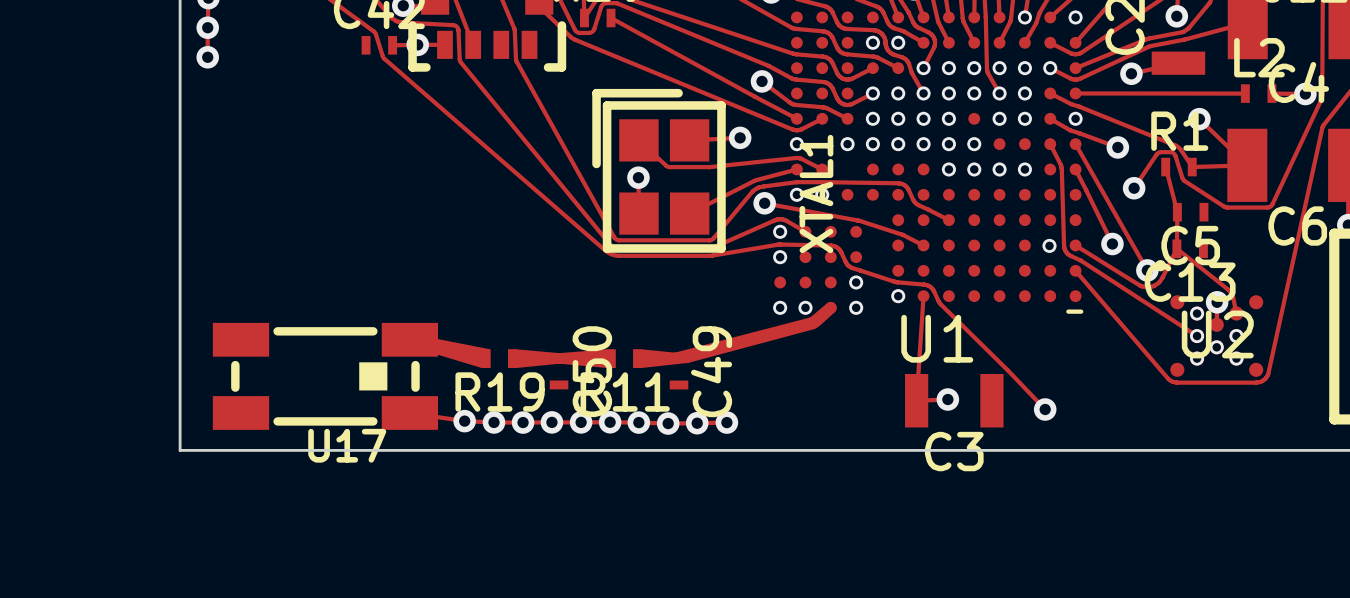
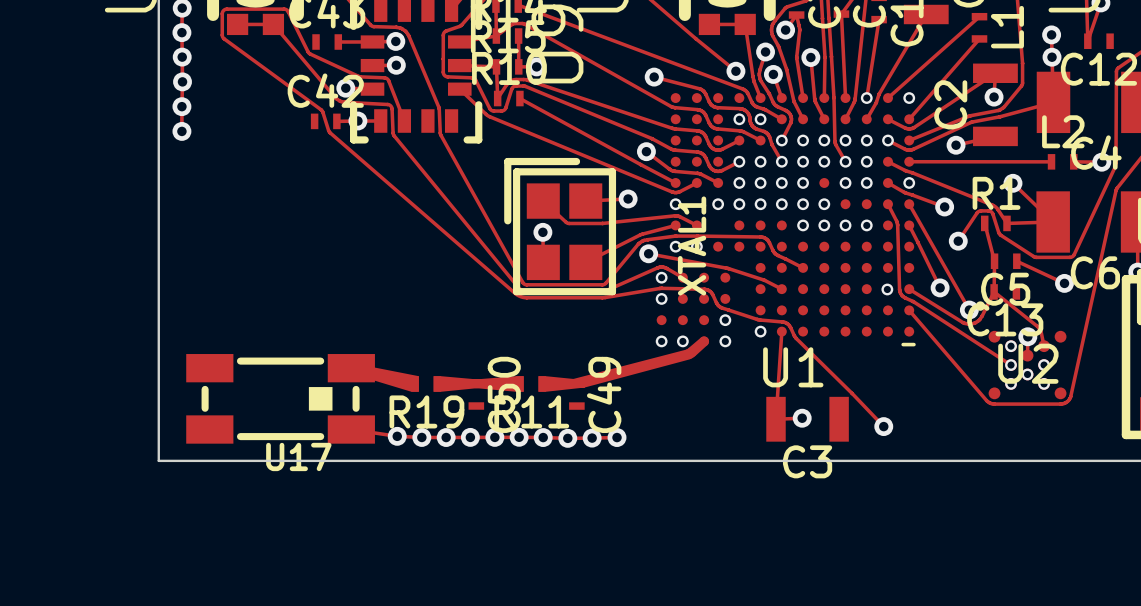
track: none -> (1016, 261) (1064, 283)
via: none -> (1064, 283)

